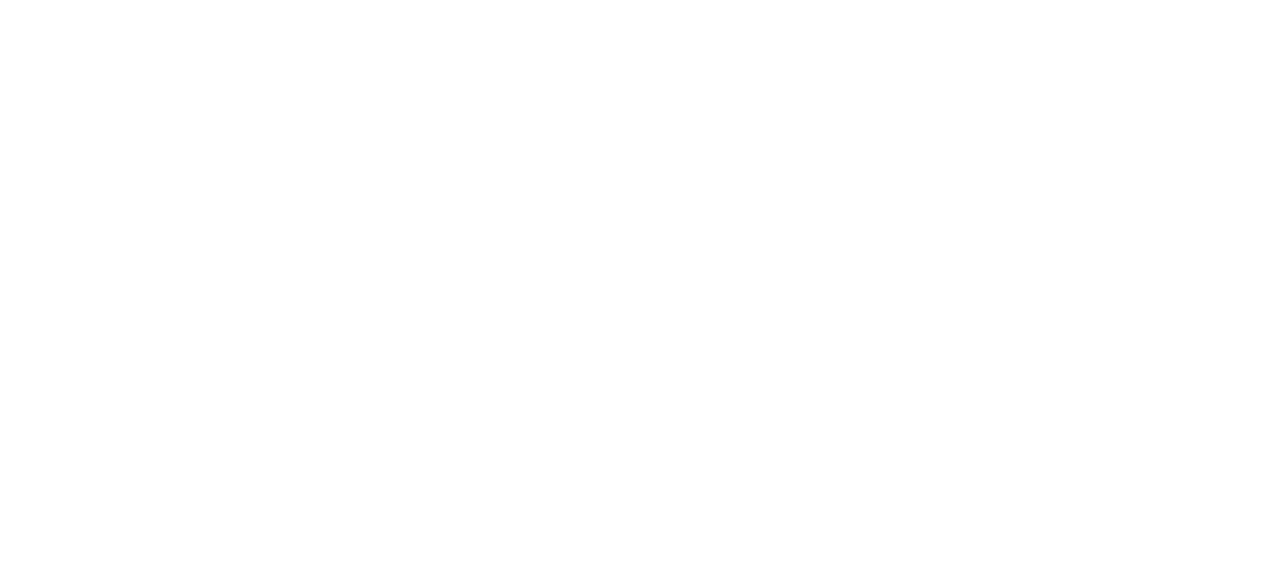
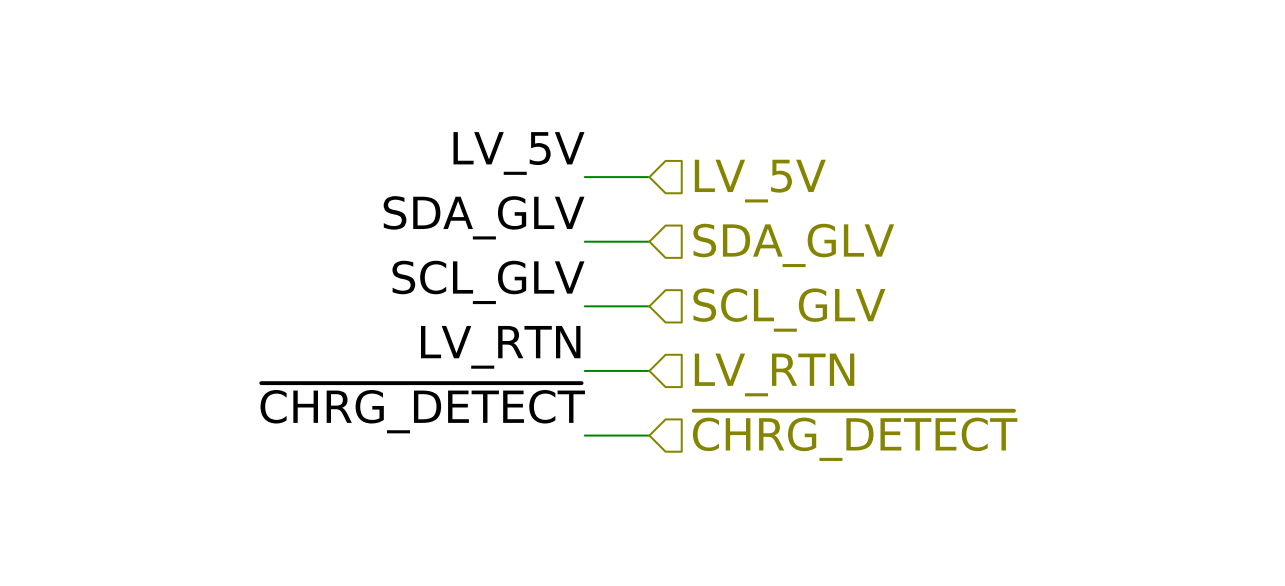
label: none -> LV_5V (518, 153)
wire: none -> (584, 177) (649, 177)
hierarchical label: none -> LV_5V (760, 181)
label: none -> SDA_GLV (484, 217)
wire: none -> (584, 241) (649, 241)
hierarchical label: none -> SDA_GLV (793, 245)
label: none -> SCL_GLV (488, 282)
wire: none -> (584, 306) (649, 306)
hierarchical label: none -> SCL_GLV (789, 310)
label: none -> LV_RTN (500, 347)
wire: none -> (584, 370) (649, 370)
hierarchical label: none -> LV_RTN (774, 374)
label: none -> ~{CHRG_DETECT} (422, 408)
wire: none -> (584, 435) (649, 435)
hierarchical label: none -> ~{CHRG_DETECT} (855, 435)

